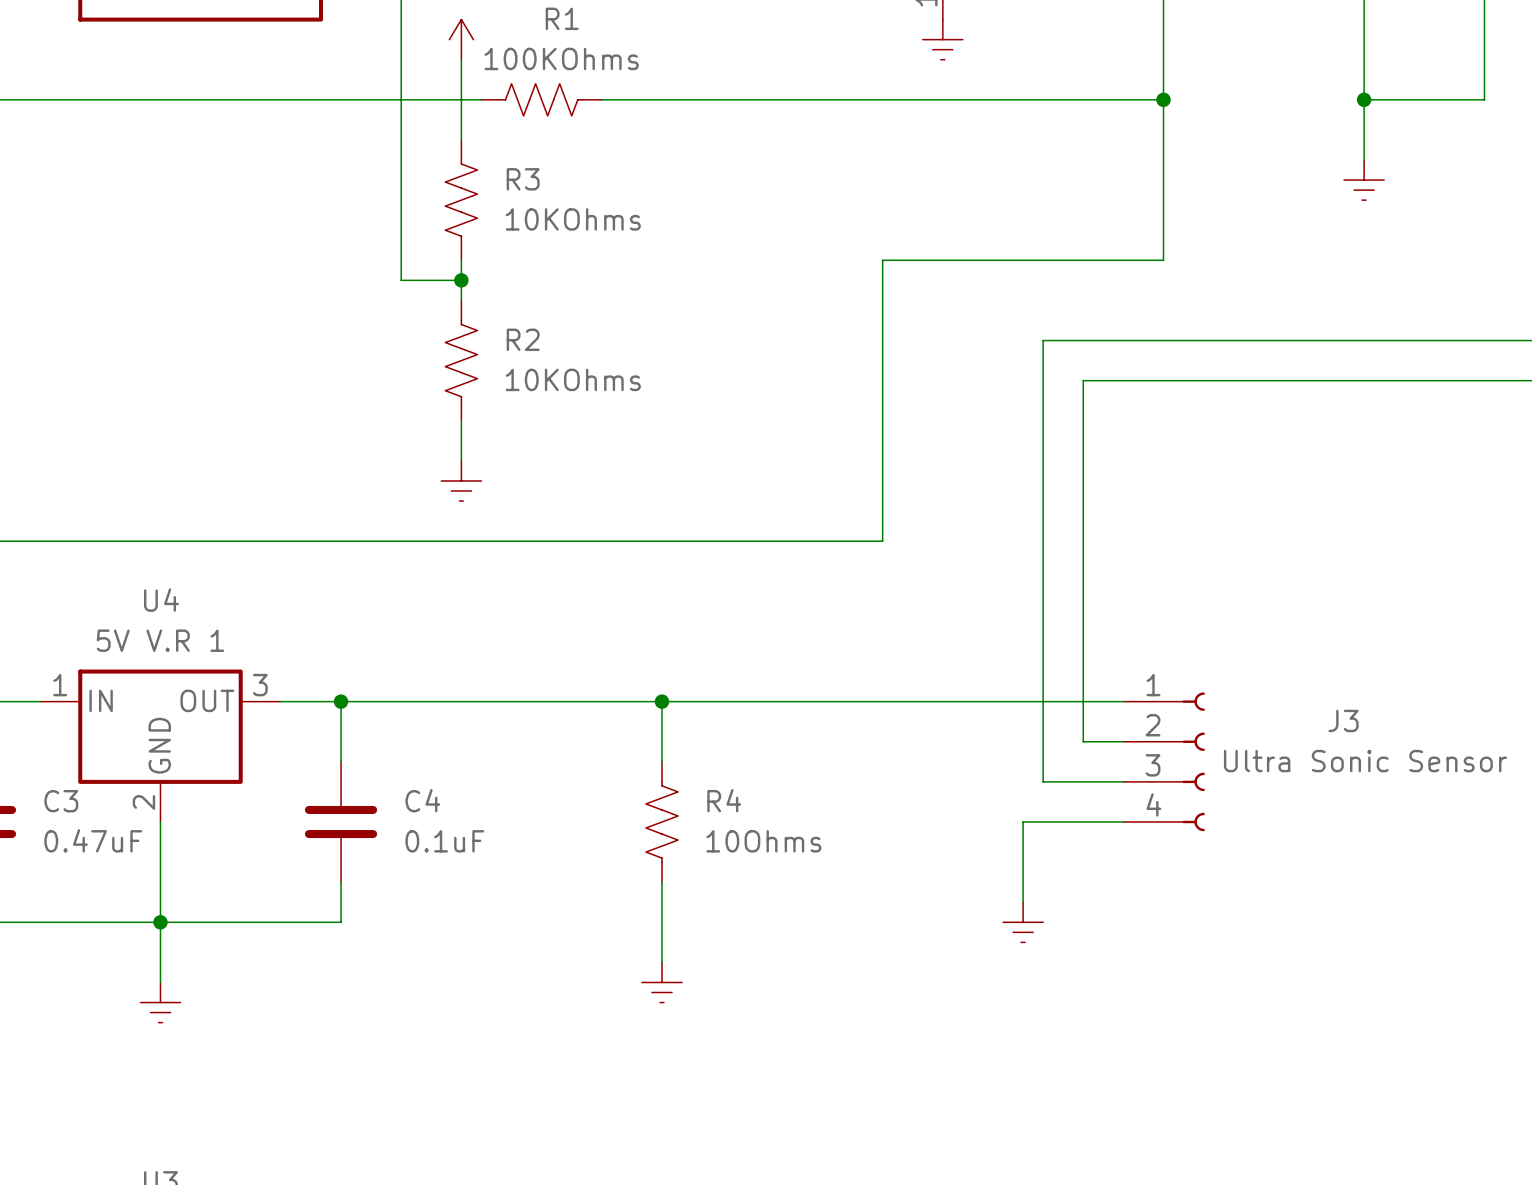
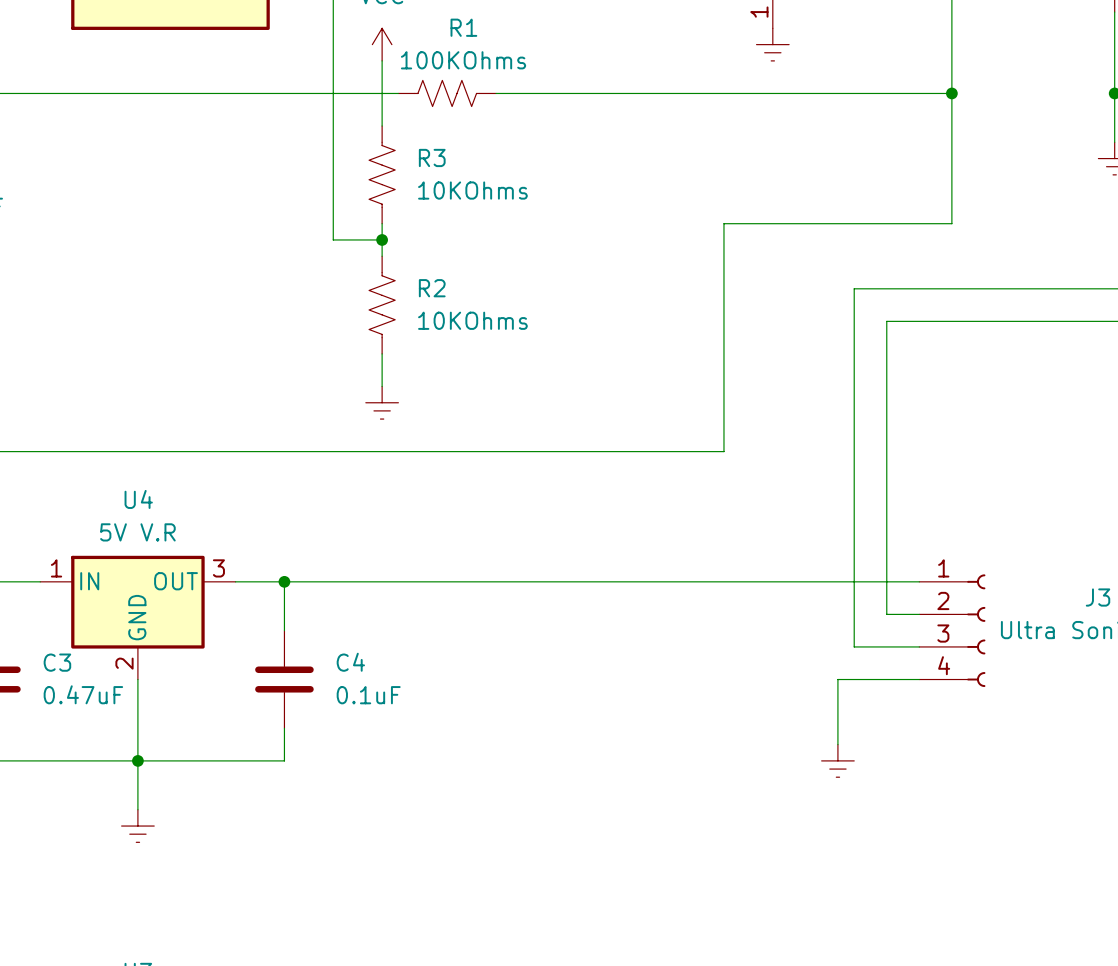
U4 value: 5V V.R 1 (160, 640) -> 5V V.R (137, 532)
wire: (662, 701) (662, 761) -> none
junction: (662, 701) -> none
R4: 10Ohms (662, 822) -> none
wire: (662, 882) (662, 962) -> none
power symbol: (662, 982) -> none

